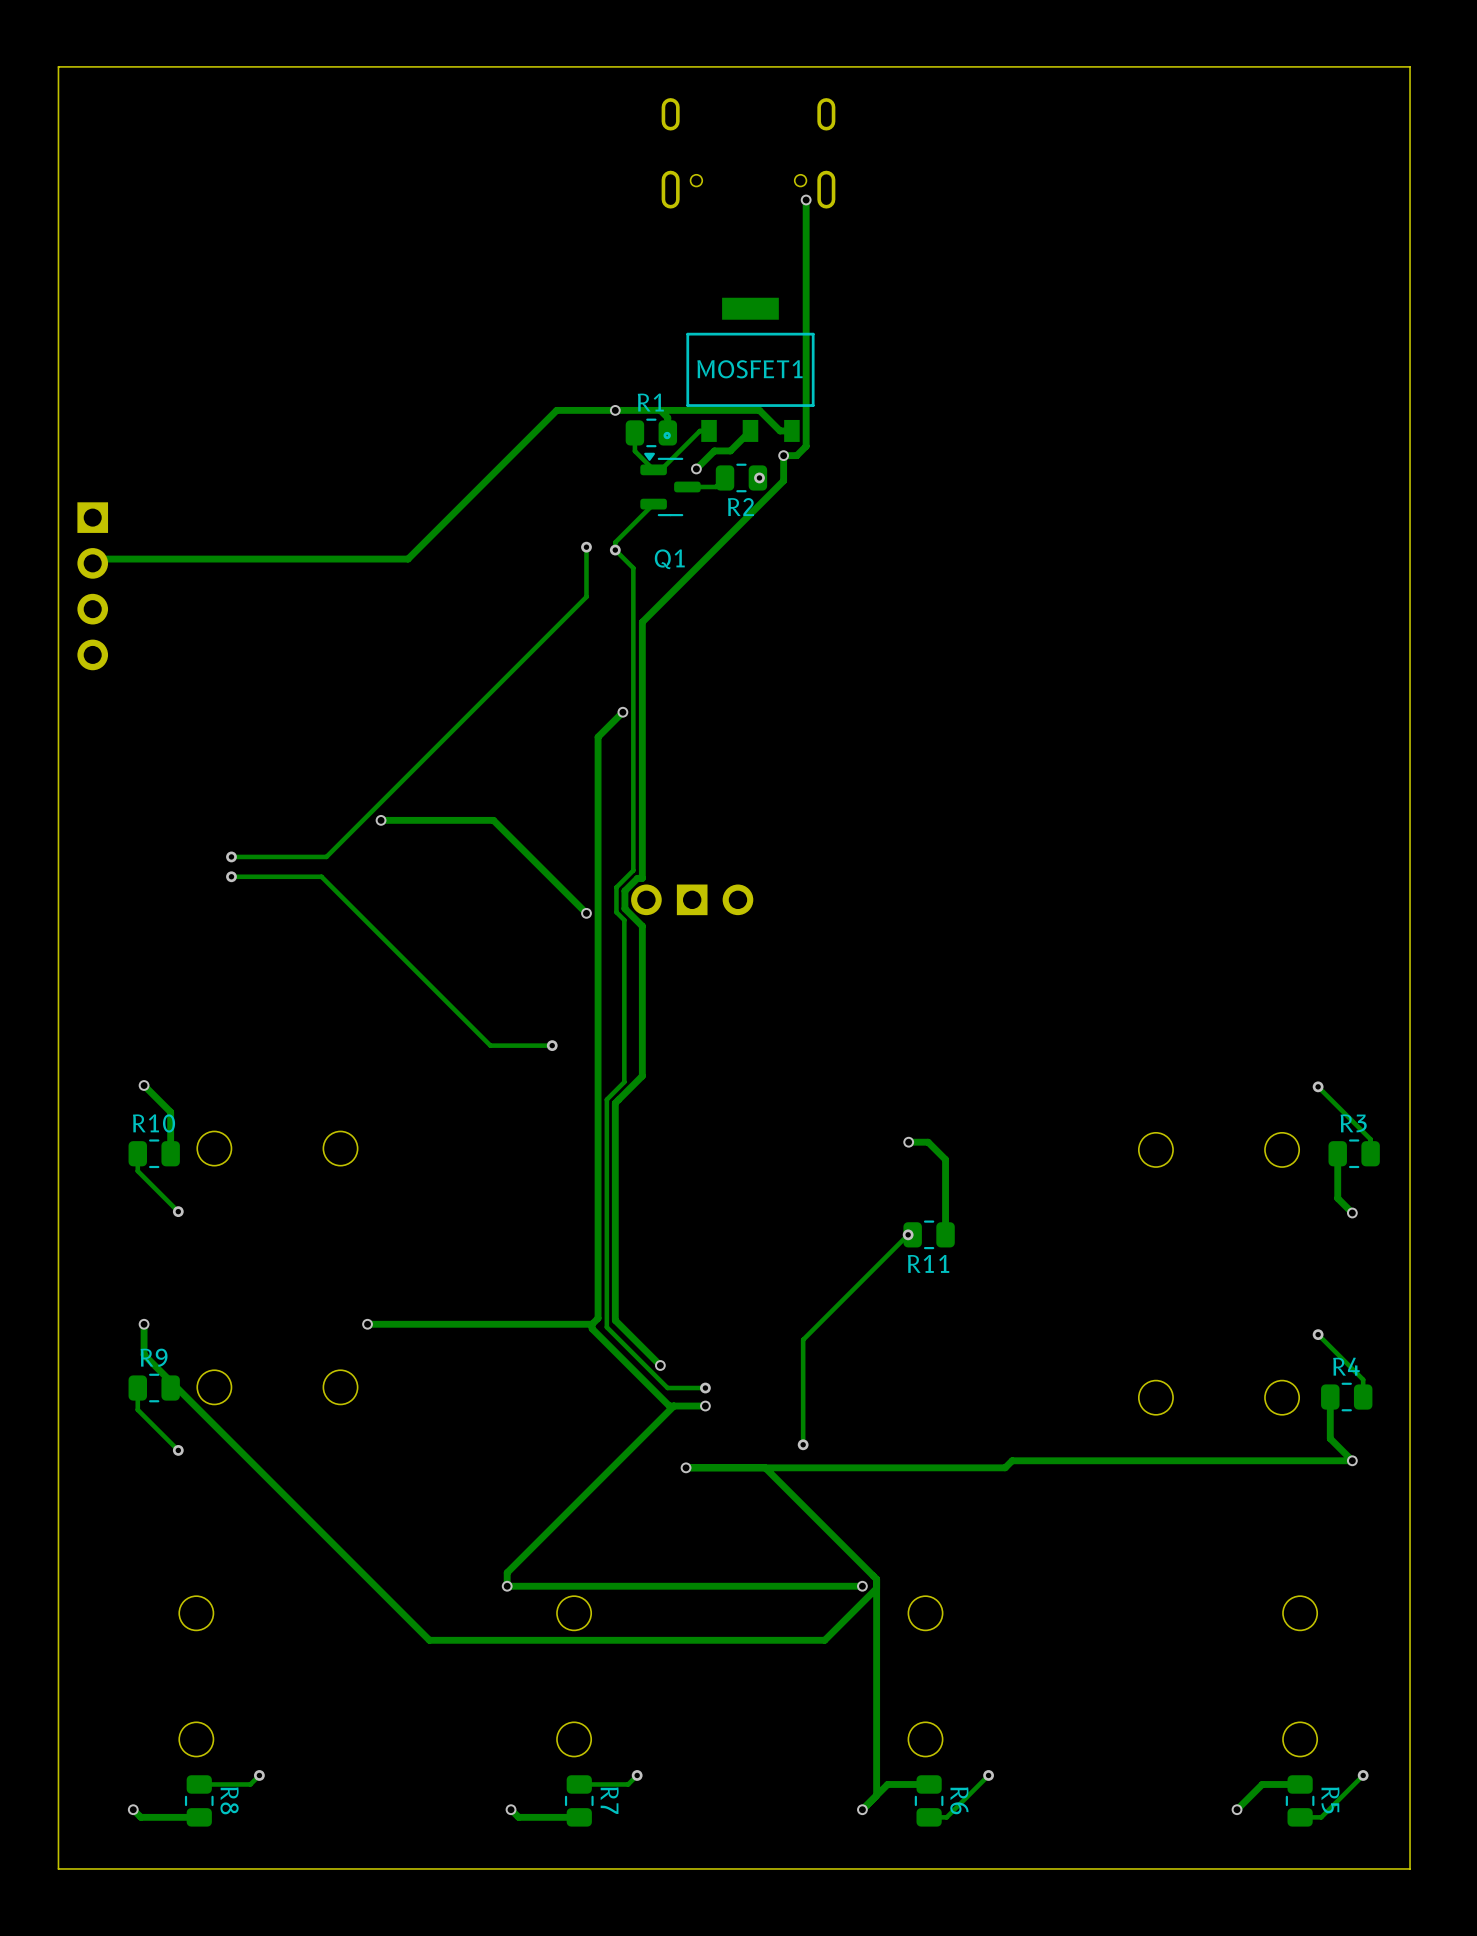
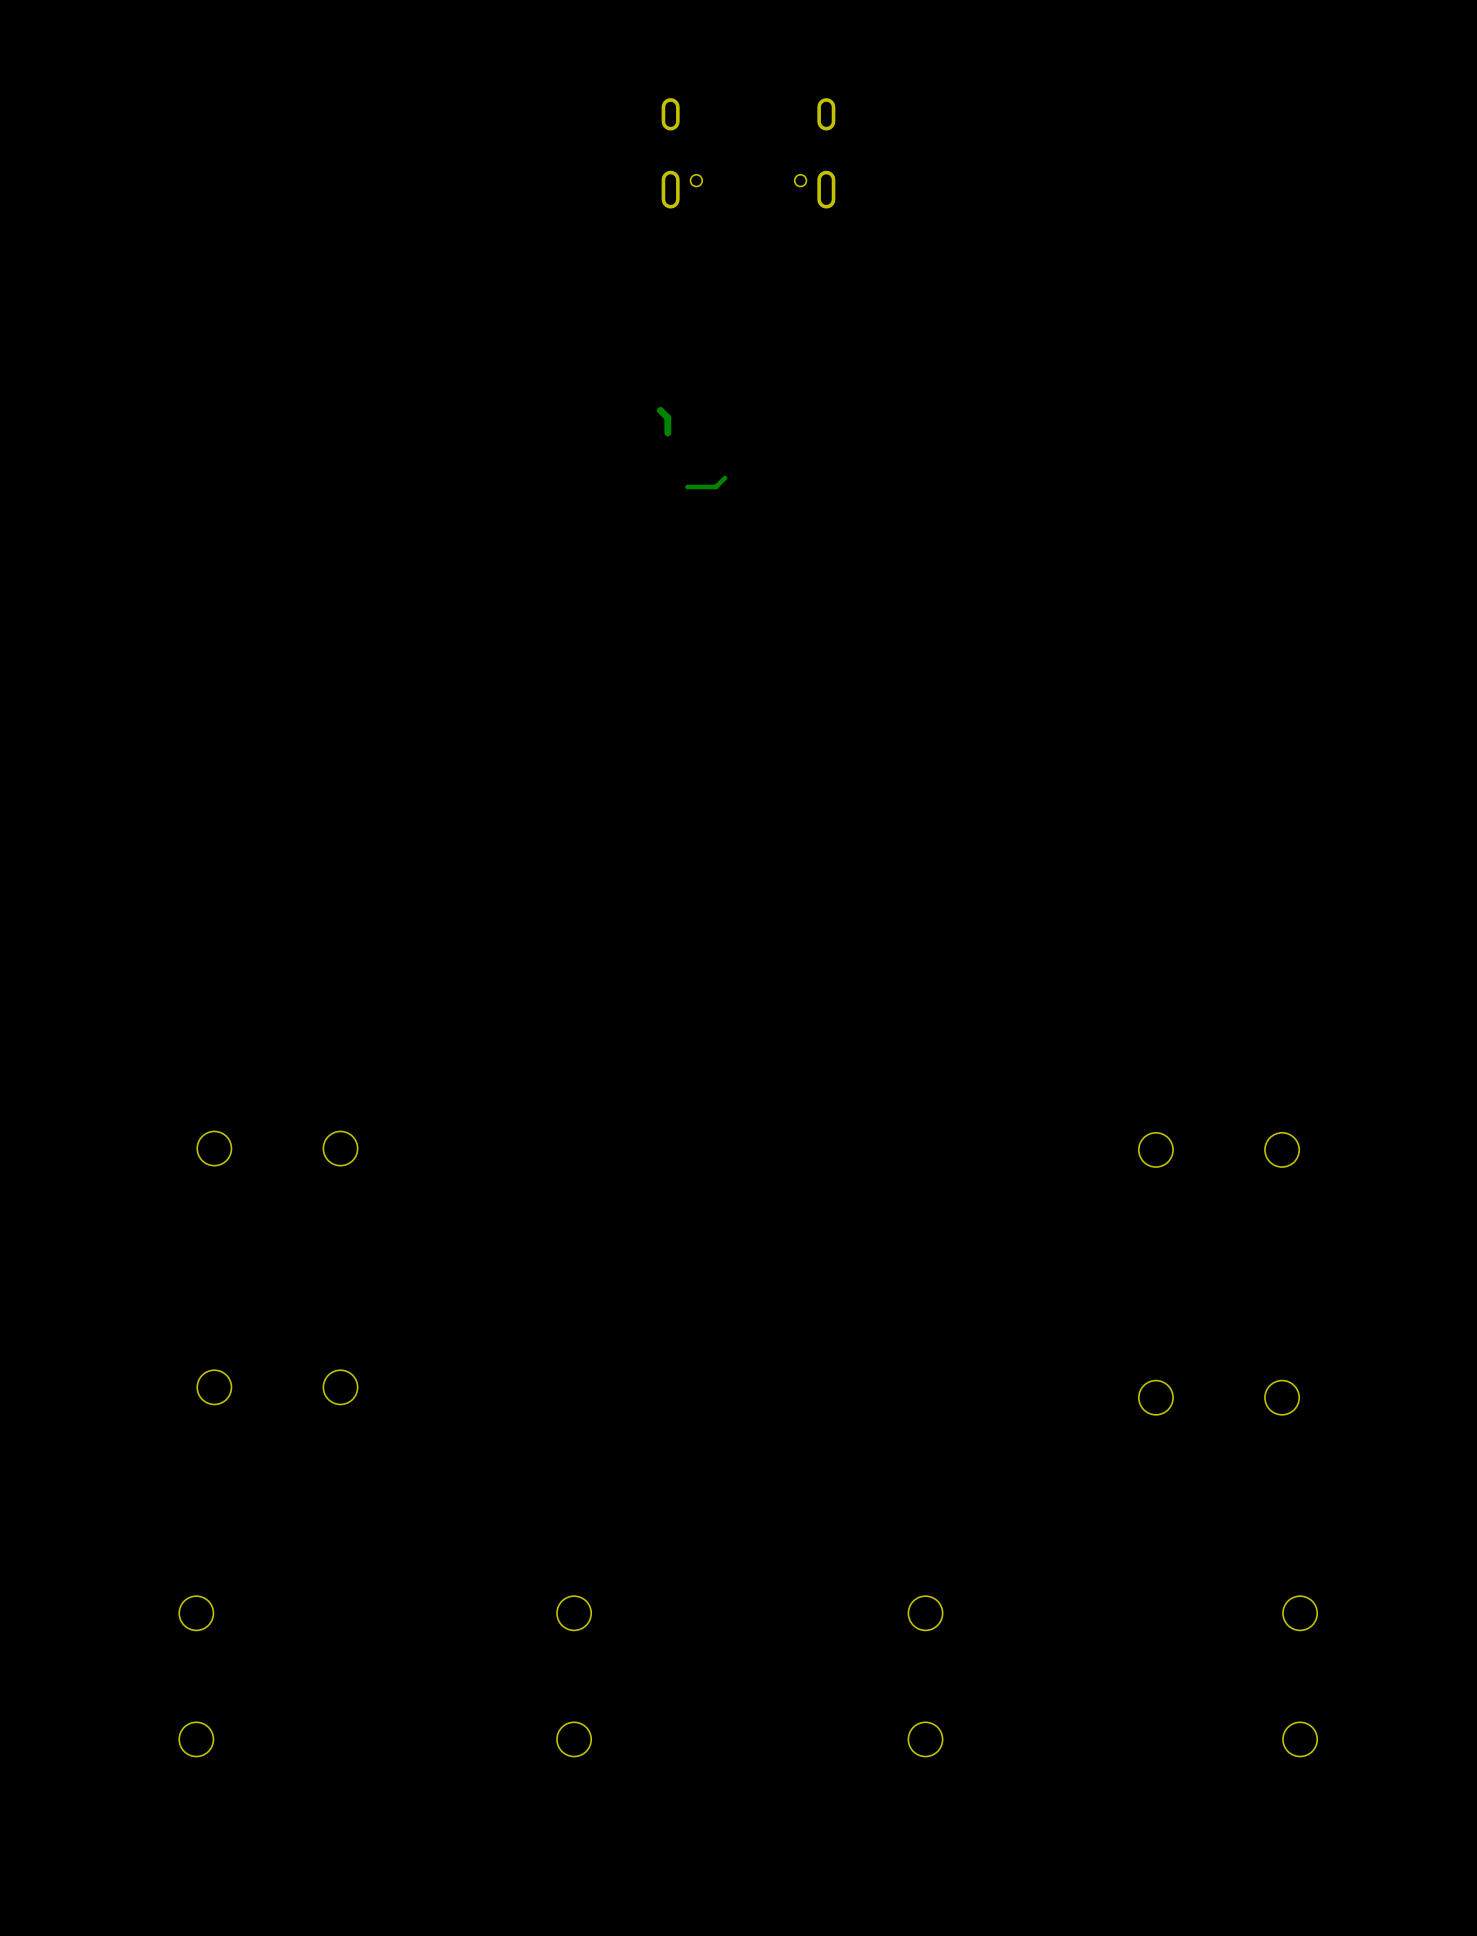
board edge: (1410, 66) (58, 66) (58, 1868) (1410, 1868) (1410, 66) -> none
track: (806, 200) (806, 446) (796, 455) (783, 455) (783, 480) (642, 622) (642, 878) (637, 878) (624, 890) (624, 908) (642, 926) (642, 1076) (615, 1103) (615, 1320) (660, 1365) -> none
via: (806, 200) -> none
MOSFET1: (739, 369) -> none
via: (615, 410) -> none
track: (709, 430) (699, 430) (661, 469) (653, 469) (634, 451) (634, 432) -> none
track: (750, 430) (730, 450) (714, 450) (696, 468) -> none
track: (791, 430) (780, 430) (759, 410) (556, 410) (408, 559) (97, 559) (92, 563) -> none
R1: (651, 432) -> none
via: (783, 455) -> none
via: (696, 468) -> none
R2: (741, 477) -> none
via: (759, 477) -> none
Q1: (670, 484) -> none
track: (653, 504) (615, 542) (615, 550) (633, 568) (633, 870) (616, 887) (616, 912) (624, 920) (624, 1082) (606, 1099) (606, 1327) (667, 1388) (705, 1388) -> none
track: (586, 547) (586, 596) (326, 856) (231, 856) -> none
via: (586, 547) -> none
via: (615, 550) -> none
part: (92, 586) -> none
track: (622, 712) (598, 737) (598, 1318) (592, 1324) -> none
via: (622, 712) -> none
track: (381, 820) (493, 820) (586, 913) -> none
via: (381, 820) -> none
via: (231, 856) -> none
track: (231, 876) (321, 876) (490, 1045) (552, 1045) -> none
via: (231, 876) -> none
part: (692, 899) -> none
via: (586, 913) -> none
via: (552, 1045) -> none
track: (144, 1085) (170, 1112) (170, 1153) -> none
via: (144, 1085) -> none
track: (1318, 1086) (1370, 1139) (1370, 1153) -> none
via: (1318, 1086) -> none
track: (908, 1142) (928, 1142) (945, 1159) (945, 1234) -> none
via: (908, 1142) -> none
track: (137, 1153) (137, 1171) (178, 1211) -> none
R10: (154, 1153) -> none
track: (1337, 1153) (1337, 1198) (1352, 1212) -> none
R3: (1354, 1153) -> none
via: (178, 1211) -> none
via: (1352, 1212) -> none
via: (908, 1234) -> none
track: (912, 1234) (908, 1234) (803, 1339) (803, 1444) -> none
R11: (929, 1234) -> none
track: (144, 1324) (144, 1354) (429, 1640) (824, 1640) (876, 1588) -> none
via: (144, 1324) -> none
via: (367, 1324) -> none
track: (592, 1324) (367, 1324) -> none
track: (592, 1324) (592, 1328) (669, 1406) (705, 1406) -> none
track: (1318, 1334) (1363, 1379) (1363, 1397) -> none
via: (1318, 1334) -> none
via: (660, 1365) -> none
track: (137, 1388) (137, 1409) (178, 1450) -> none
R9: (154, 1388) -> none
via: (705, 1388) -> none
track: (1330, 1397) (1330, 1438) (1352, 1460) (1012, 1460) (1005, 1467) (686, 1467) -> none
R4: (1346, 1397) -> none
track: (673, 1406) (507, 1572) (507, 1586) (862, 1586) -> none
via: (705, 1406) -> none
via: (803, 1444) -> none
via: (178, 1450) -> none
via: (1352, 1460) -> none
via: (686, 1467) -> none
track: (765, 1467) (876, 1579) (876, 1793) -> none
via: (507, 1586) -> none
via: (862, 1586) -> none
track: (259, 1775) (250, 1784) (199, 1784) -> none
via: (259, 1775) -> none
track: (637, 1775) (628, 1784) (579, 1784) -> none
via: (637, 1775) -> none
track: (988, 1775) (946, 1817) (929, 1817) -> none
via: (988, 1775) -> none
track: (1363, 1775) (1321, 1817) (1300, 1817) -> none
via: (1363, 1775) -> none
track: (929, 1784) (887, 1784) (862, 1809) -> none
track: (1300, 1784) (1262, 1784) (1237, 1809) -> none
R8: (199, 1800) -> none
R7: (579, 1800) -> none
R6: (929, 1800) -> none
R5: (1300, 1800) -> none
track: (133, 1809) (140, 1817) (199, 1817) -> none
via: (133, 1809) -> none
track: (511, 1809) (518, 1817) (579, 1817) -> none
via: (511, 1809) -> none
via: (862, 1809) -> none
via: (1237, 1809) -> none

